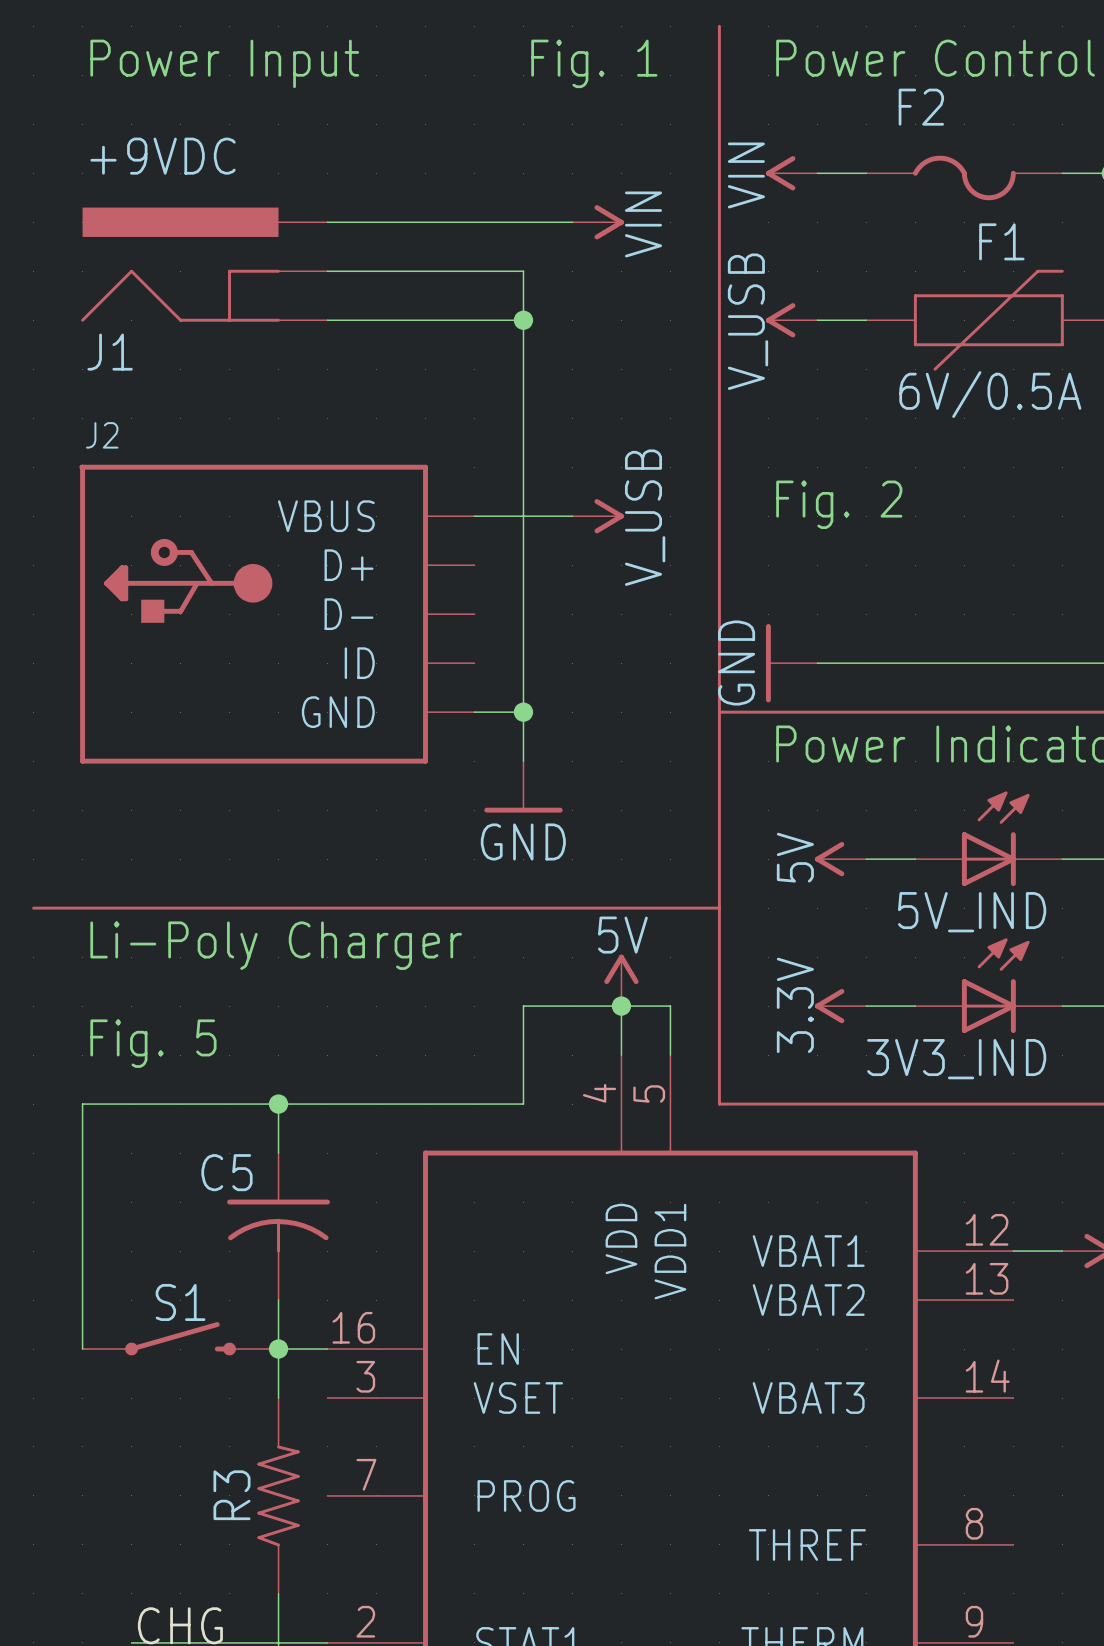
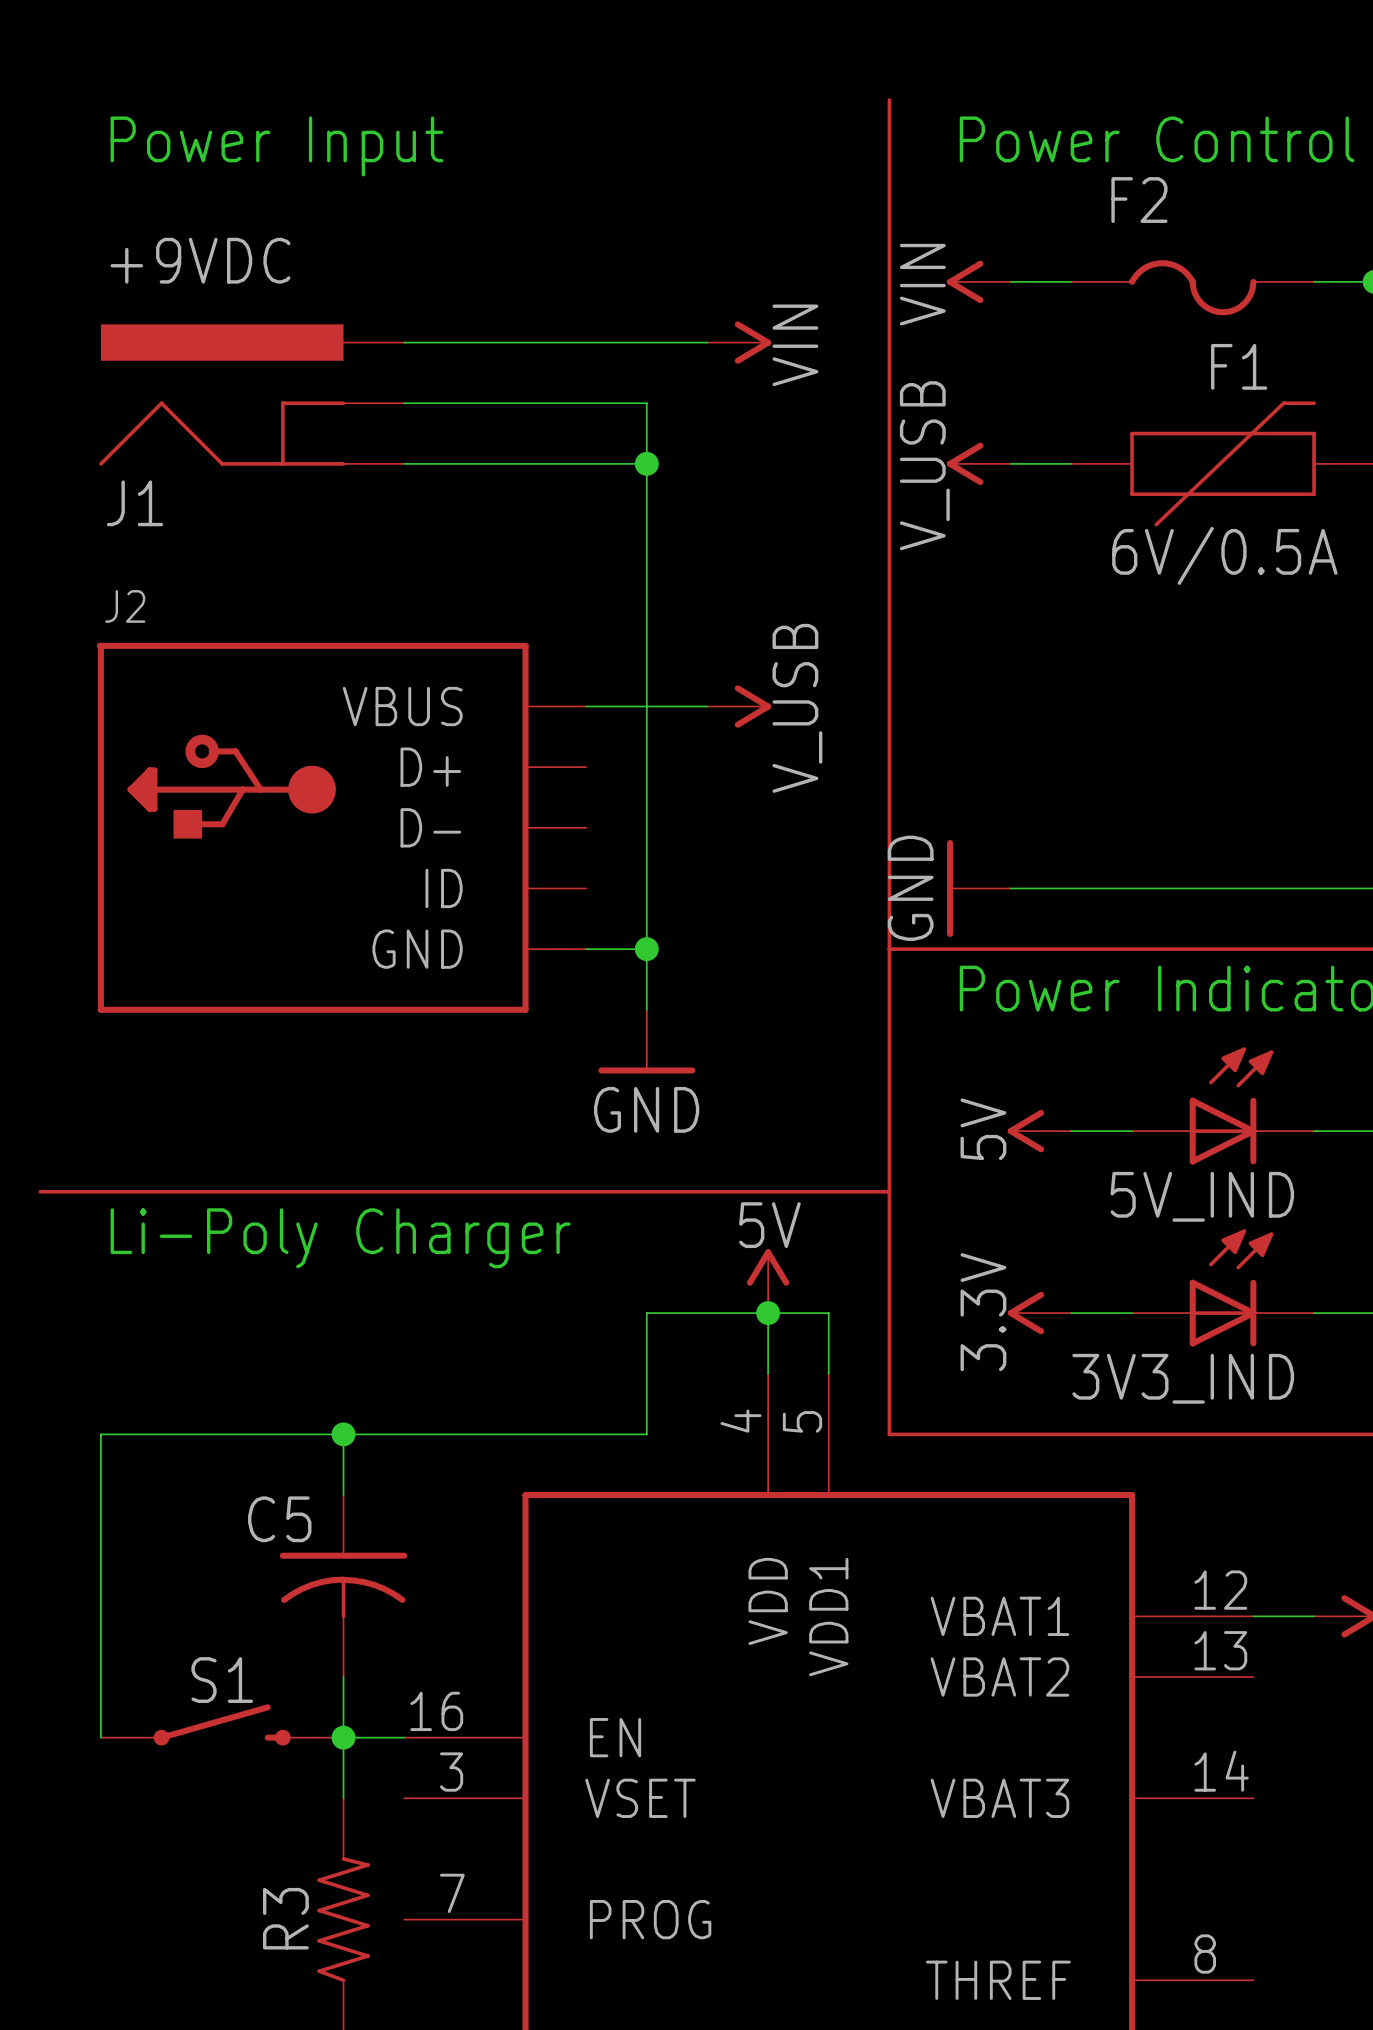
text: Fig. 1 (594, 63) -> none
text: Fig. 2 (839, 504) -> none
text: Fig. 5 (153, 1043) -> none

